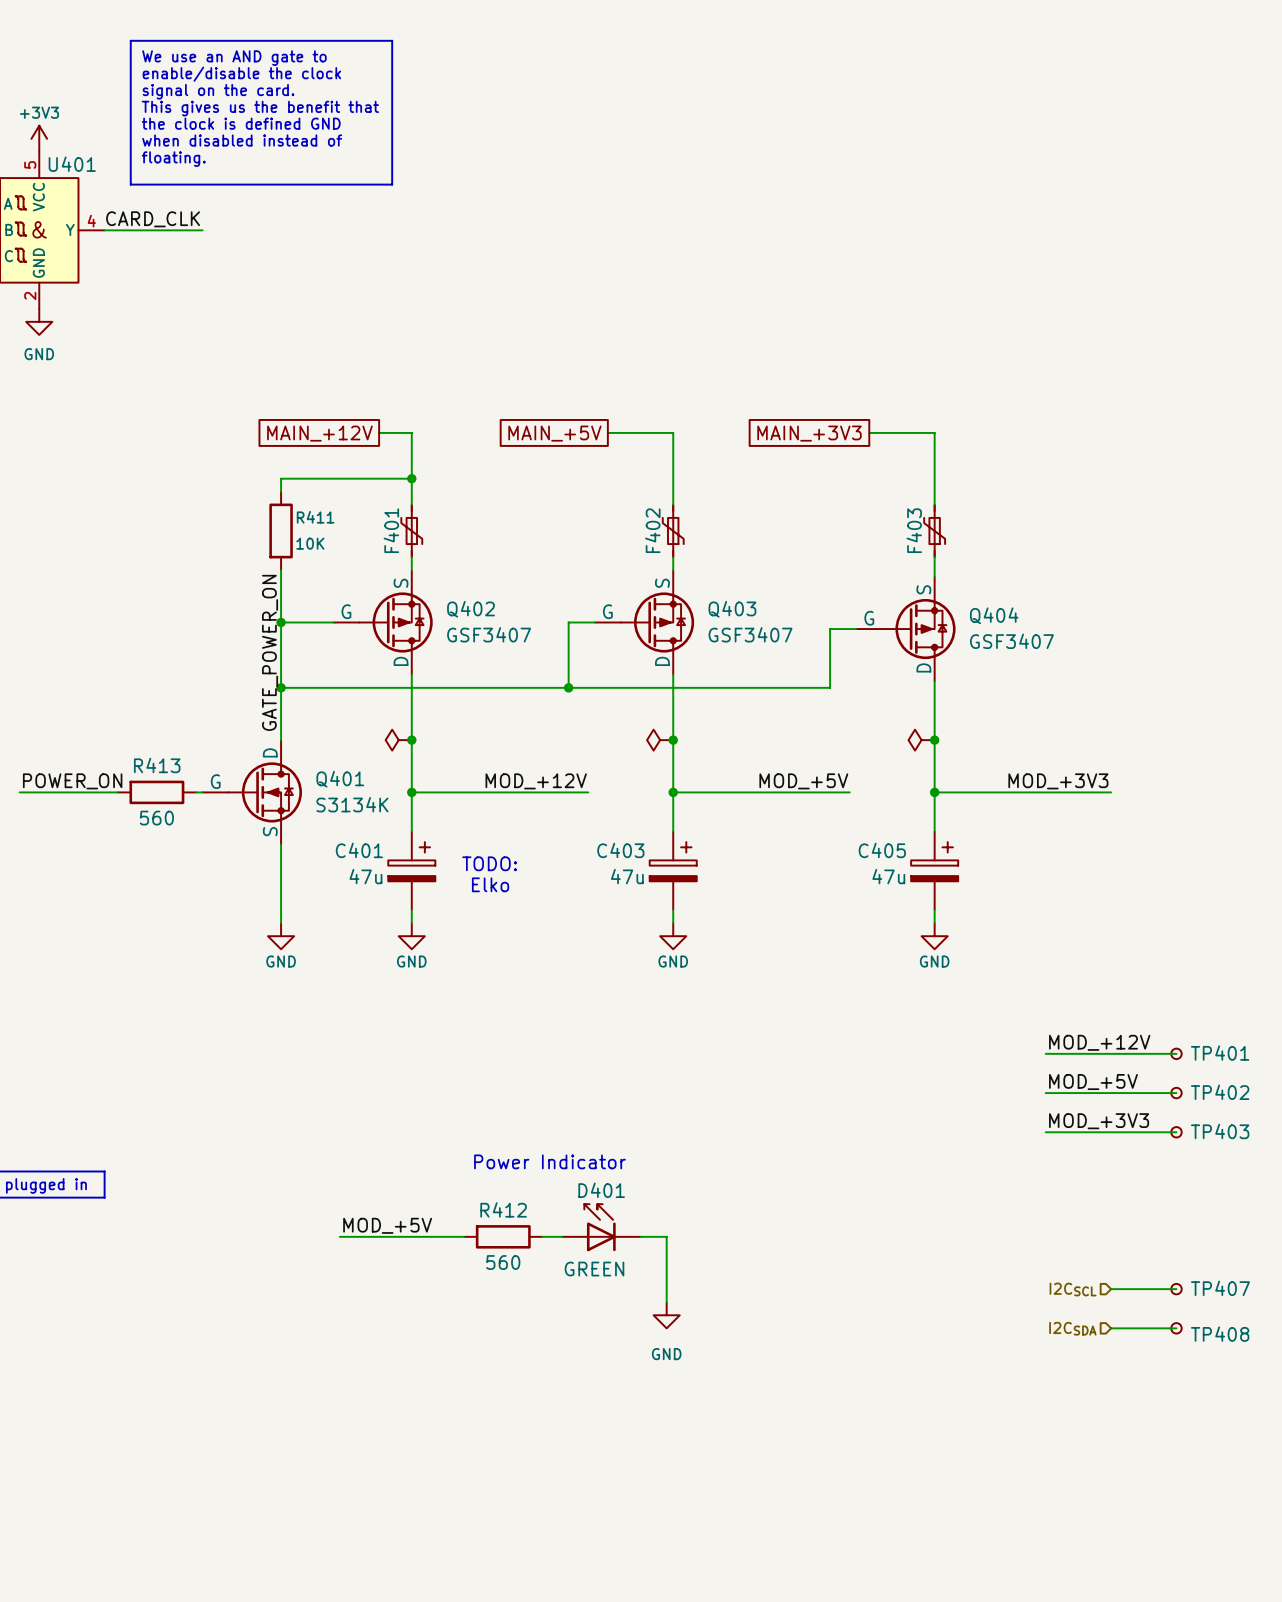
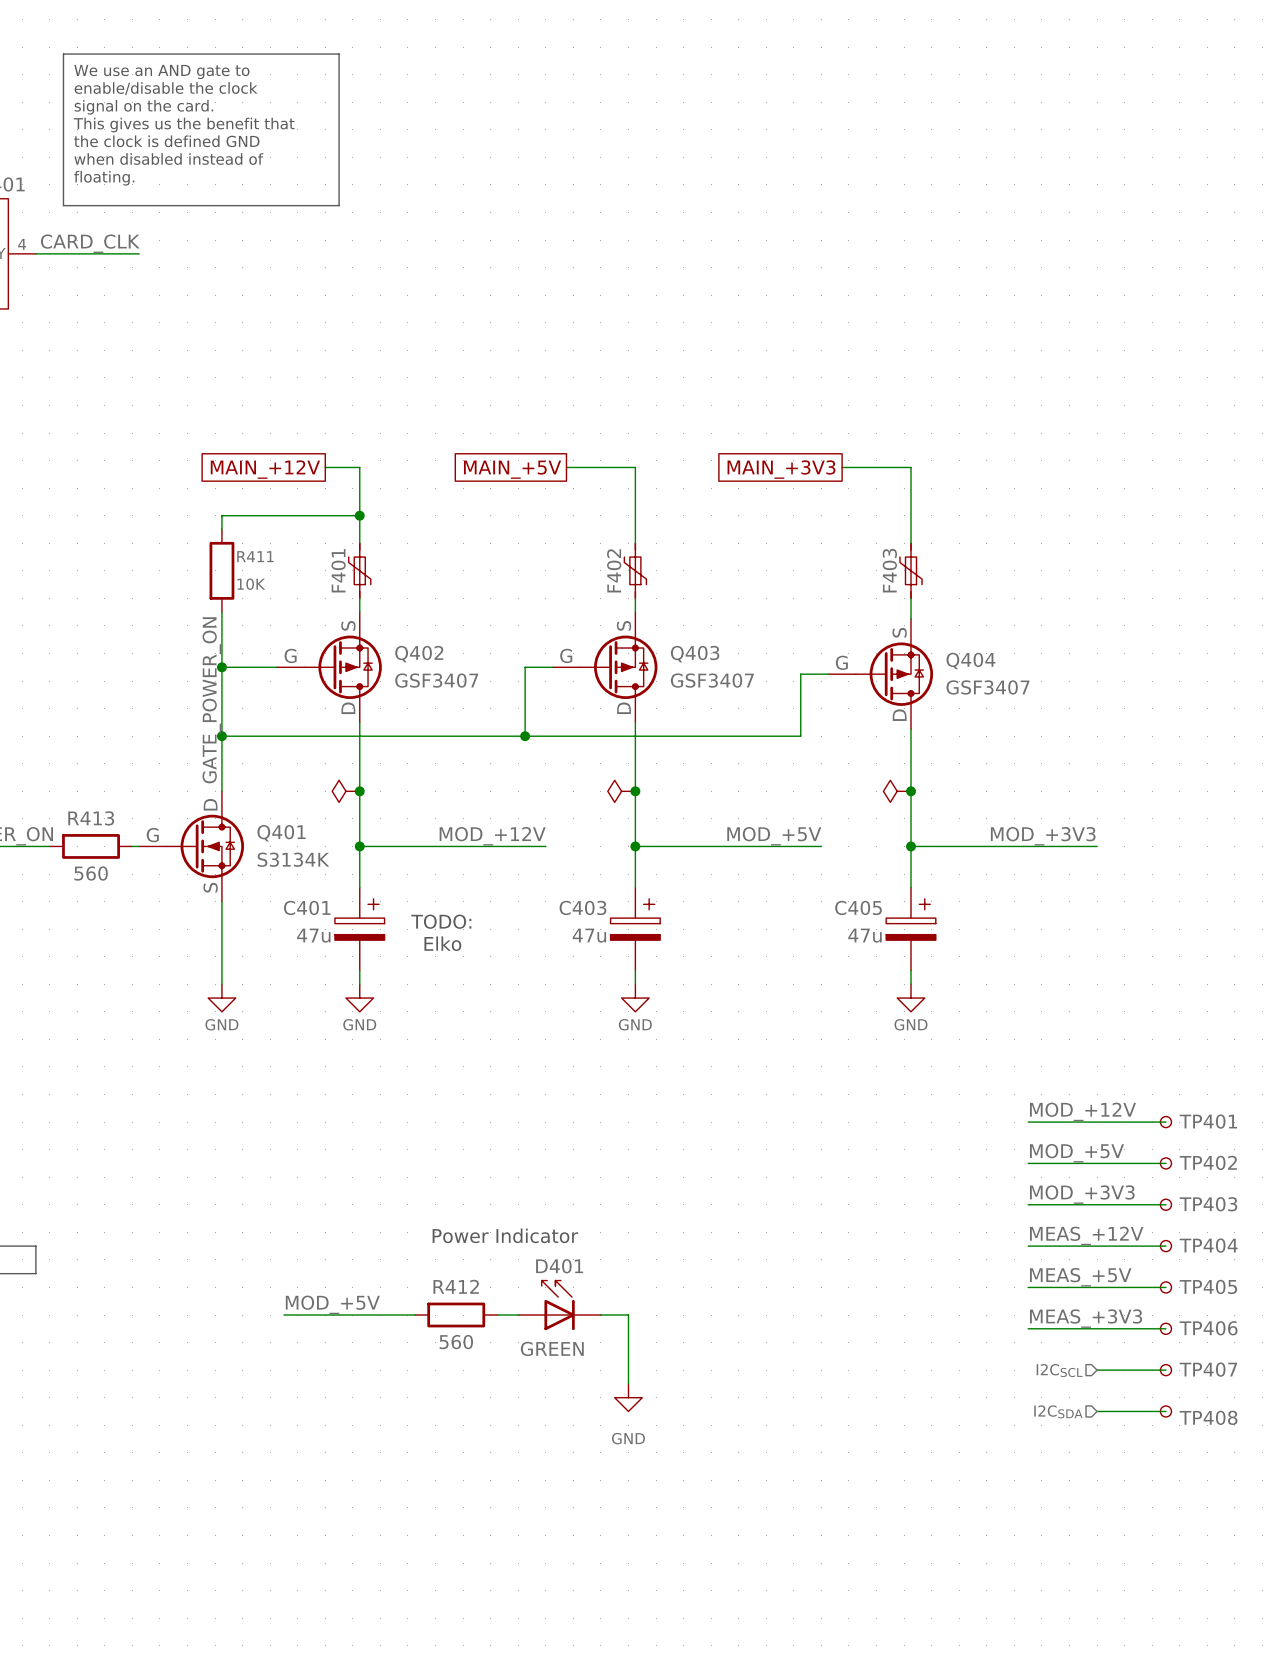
label: none -> MEAS_+12V (1086, 1235)
wire: none -> (1028, 1246) (1165, 1246)
TP404: none -> (1165, 1246)
label: none -> MEAS_+5V (1080, 1277)
wire: none -> (1028, 1287) (1165, 1287)
TP405: none -> (1165, 1287)
label: none -> MEAS_+3V3 (1086, 1318)
wire: none -> (1028, 1328) (1165, 1328)
TP406: none -> (1165, 1328)

